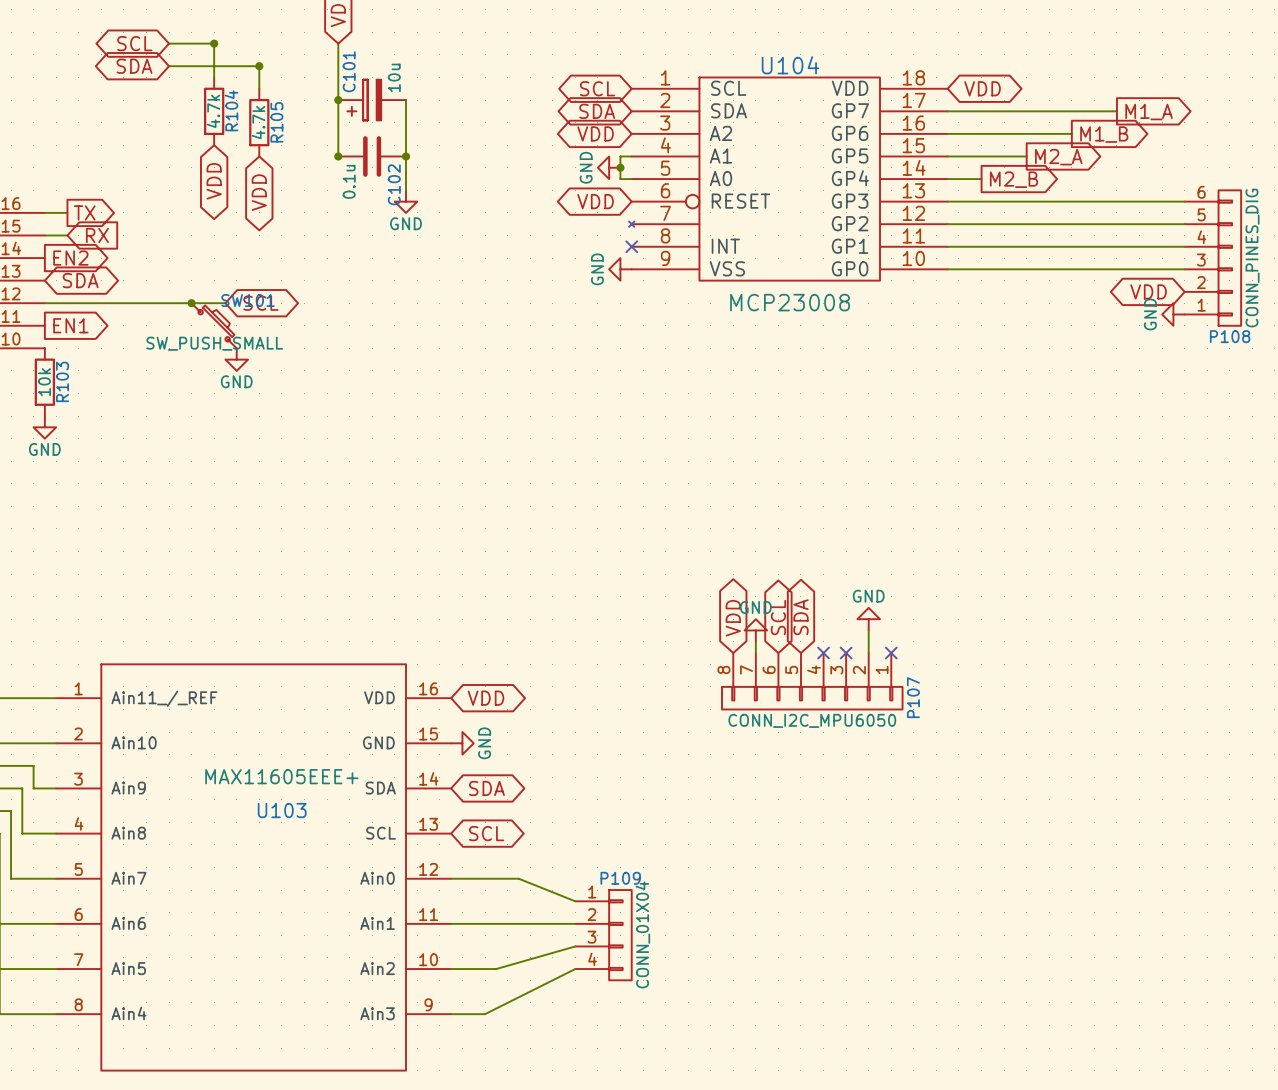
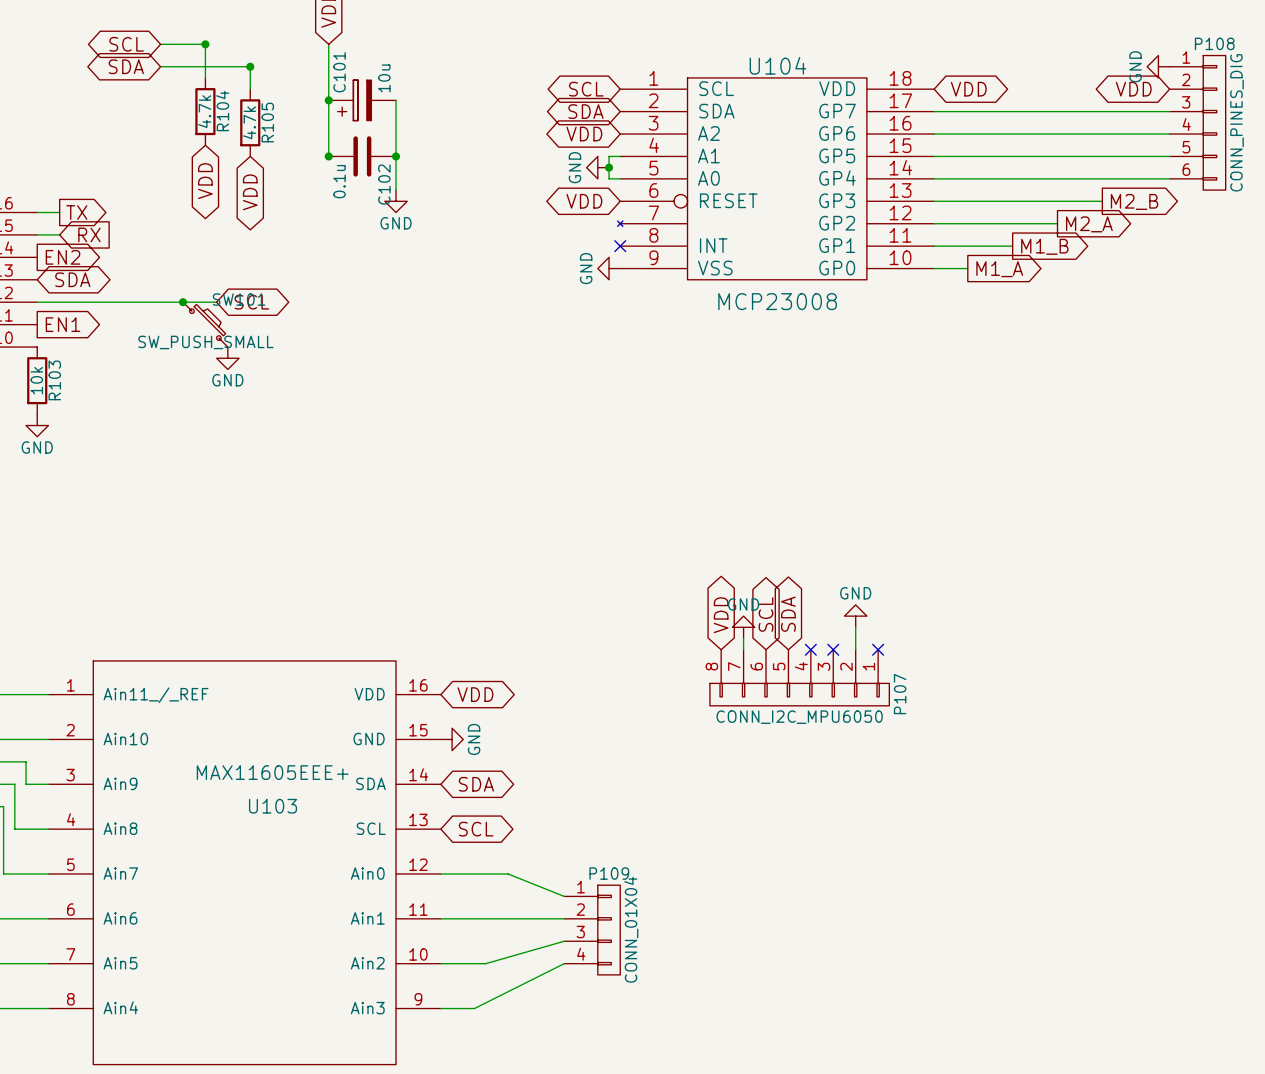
power symbol: none -> GND (1158, 66)
global label position: M1_A (1149, 111) -> M1_A (999, 269)
global label position: M1_B (1104, 134) -> M1_B (1044, 246)
global label position: M2_A (1058, 157) -> M2_A (1089, 224)
global label position: M2_B (1013, 179) -> M2_B (1134, 201)
wire: (1116, 201) (1184, 201) -> (1102, 111) (1169, 111)
wire: (1071, 224) (1184, 224) -> (1057, 134) (1169, 134)
wire: (1026, 246) (1184, 246) -> (1012, 156) (1169, 156)
P108 position: (1212, 258) -> (1197, 122)
P108 flip: as is (1229, 258) -> up-down (1214, 122)
wire: (981, 269) (1184, 269) -> (967, 178) (1169, 178)
global label position: VDD (1148, 291) -> VDD (1133, 89)
power symbol: GND (1173, 314) -> none

